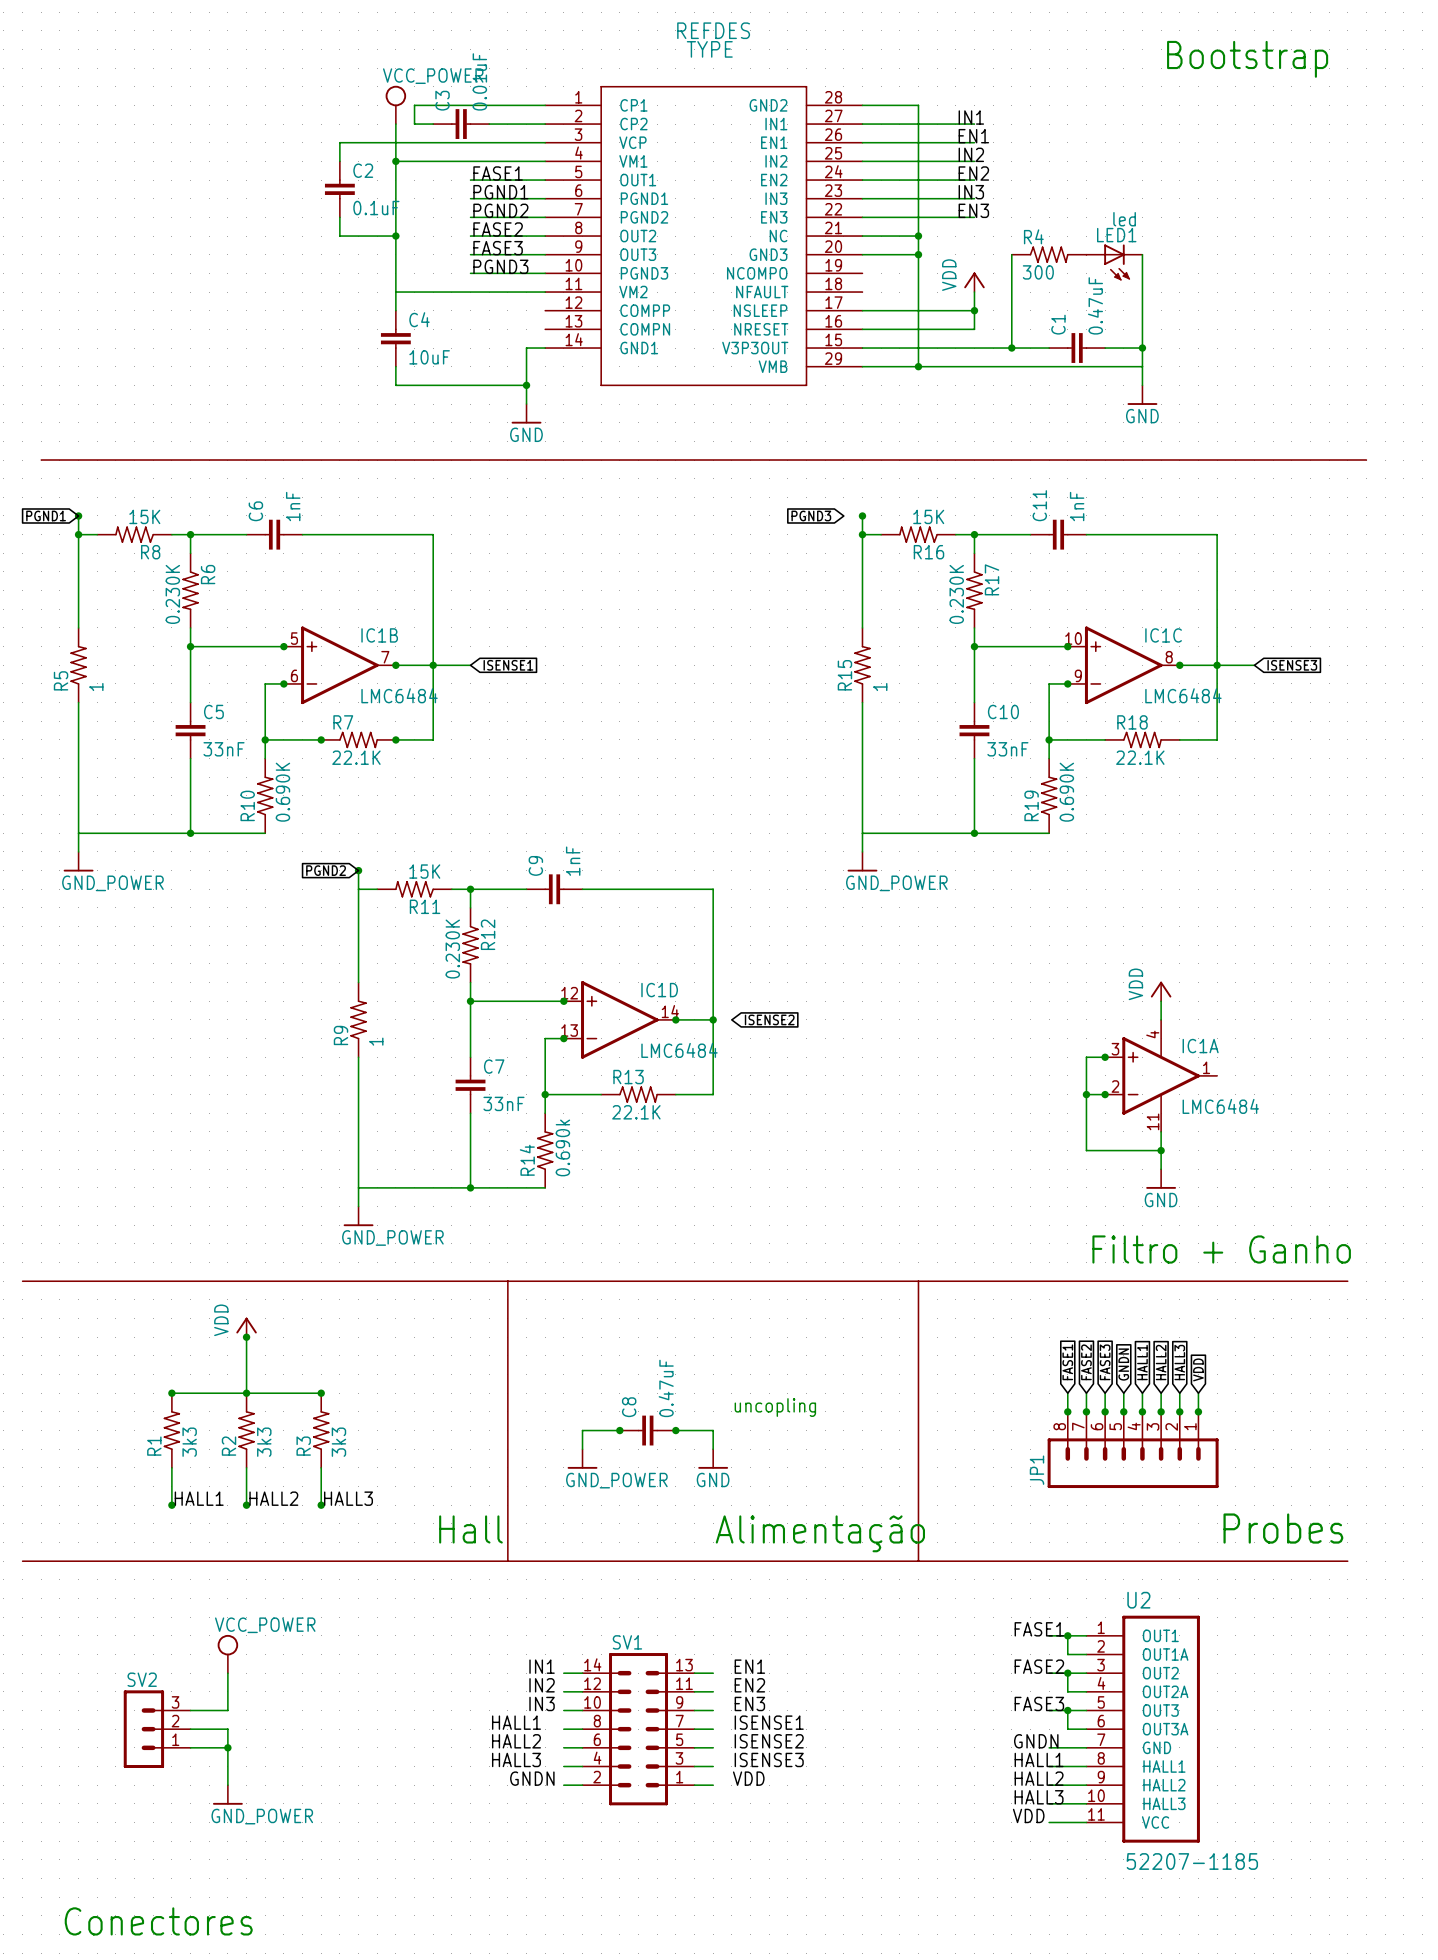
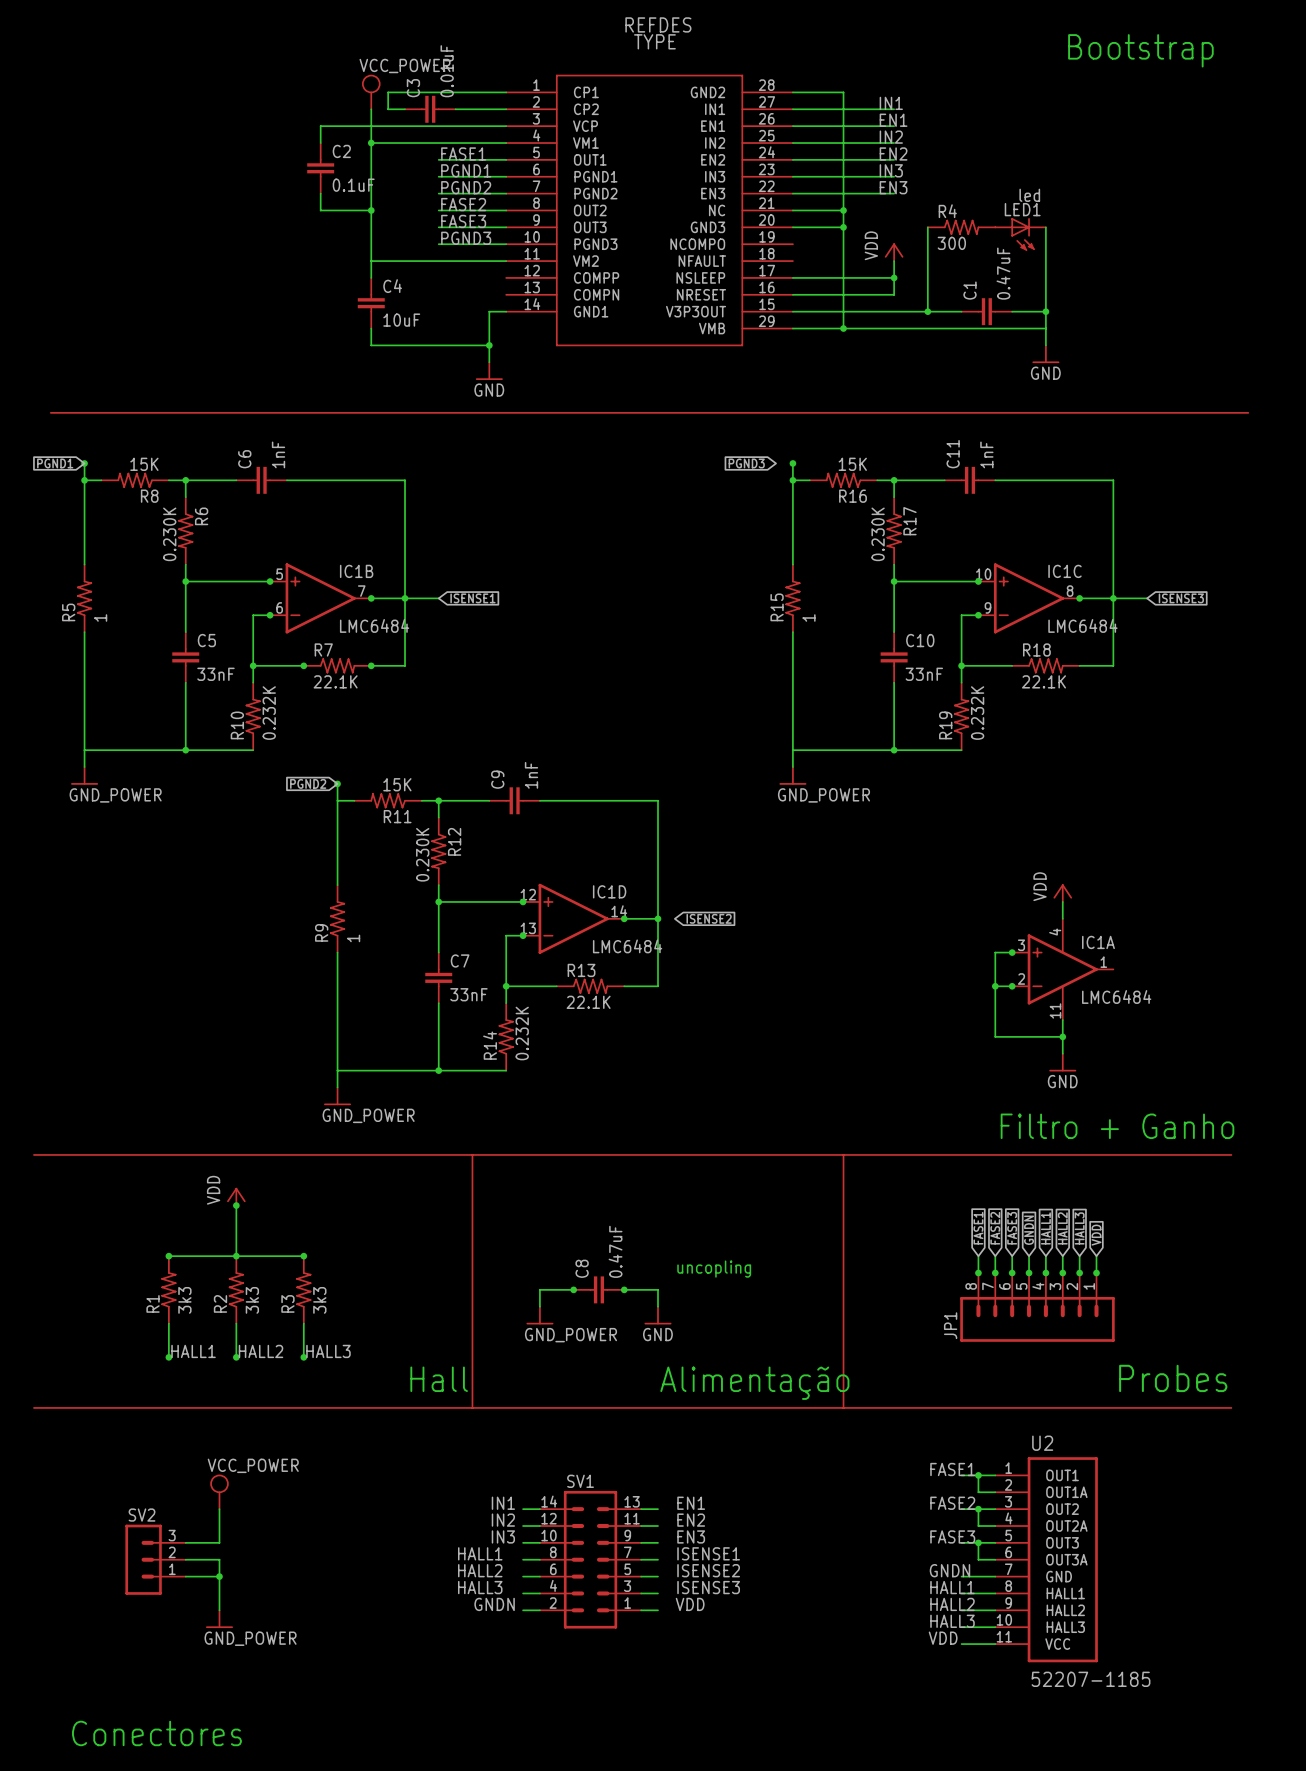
R10 value: 0.690K (282, 792) -> 0.232K (269, 713)
R19 value: 0.690K (1066, 792) -> 0.232K (977, 713)
R14 value: 0.690k (562, 1147) -> 0.232K (522, 1033)

